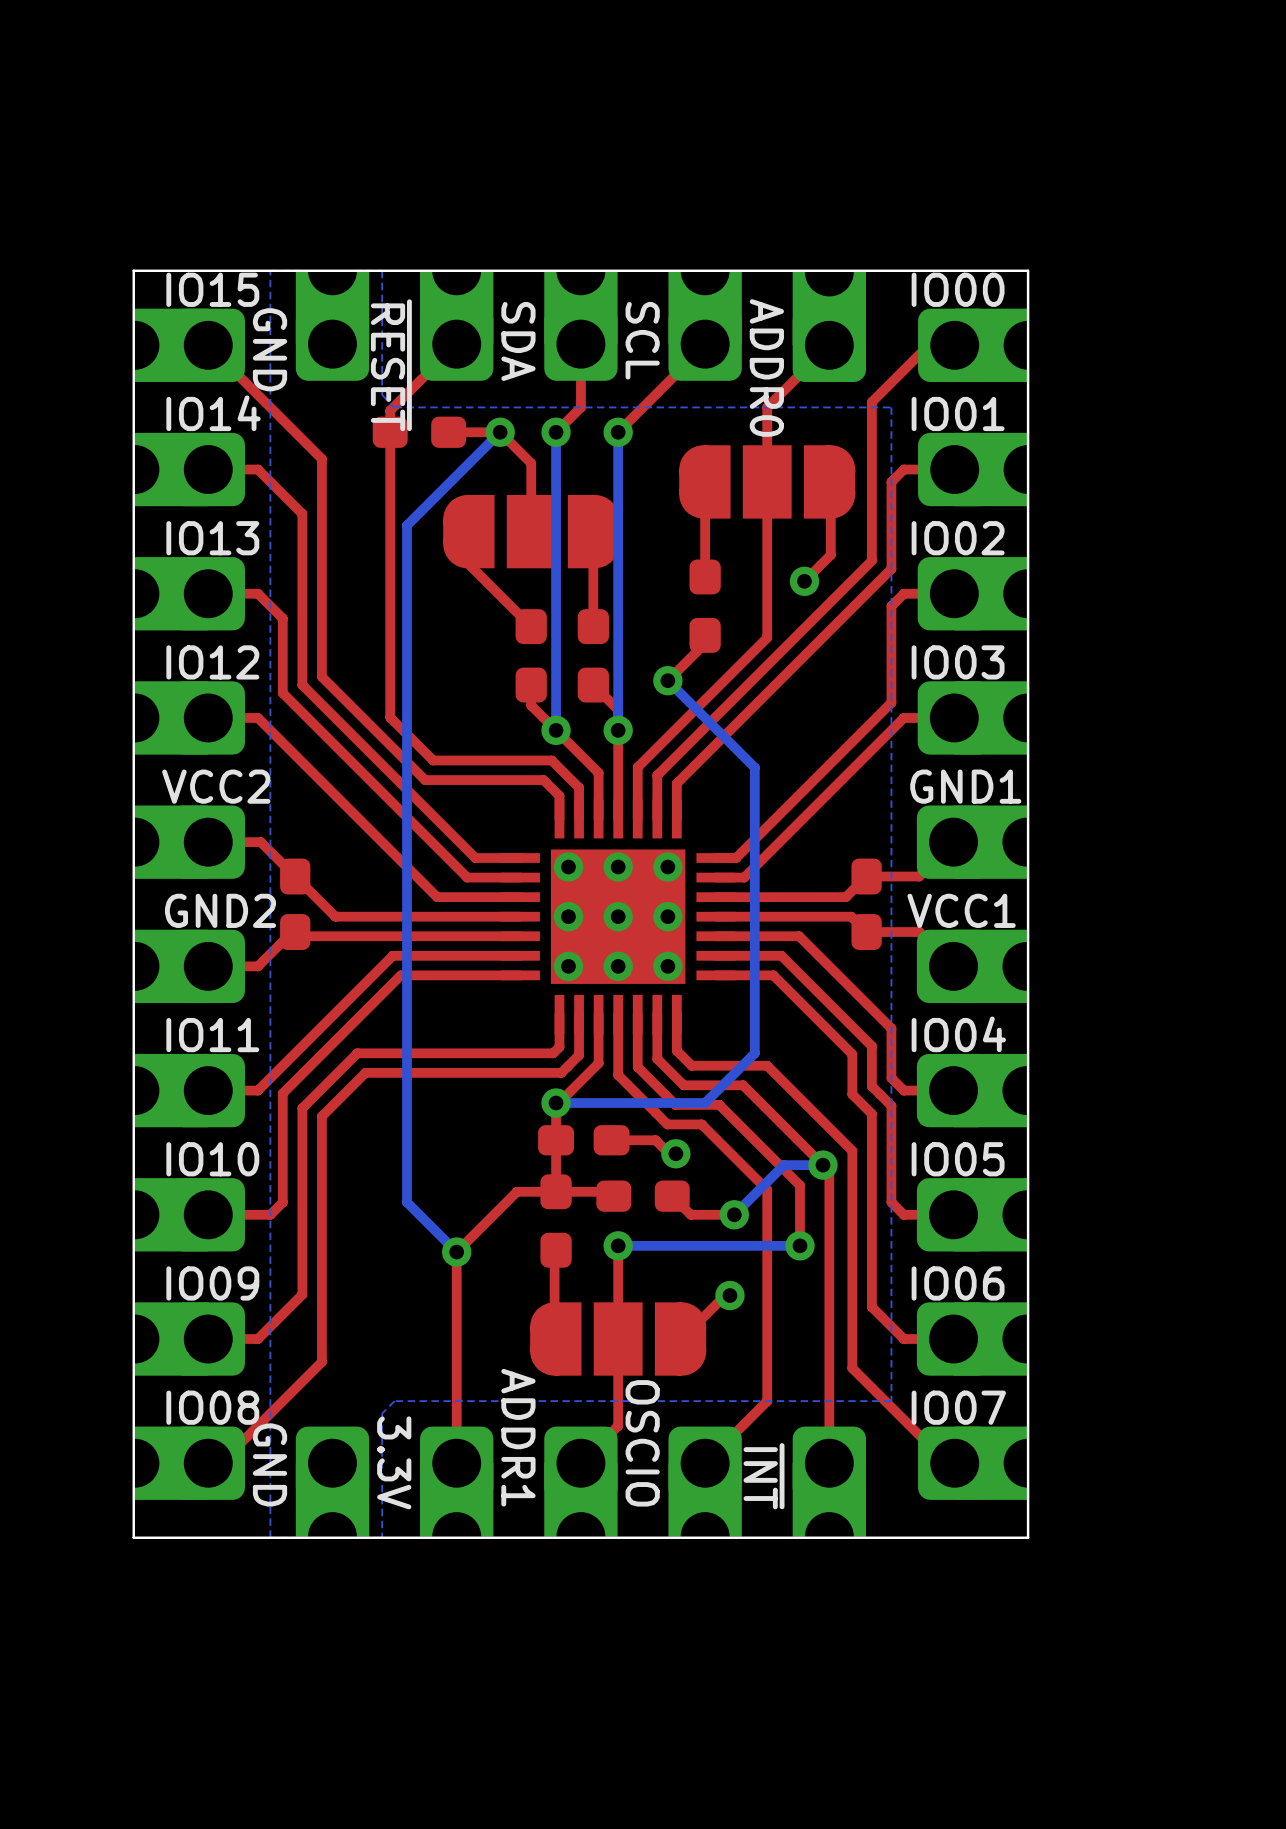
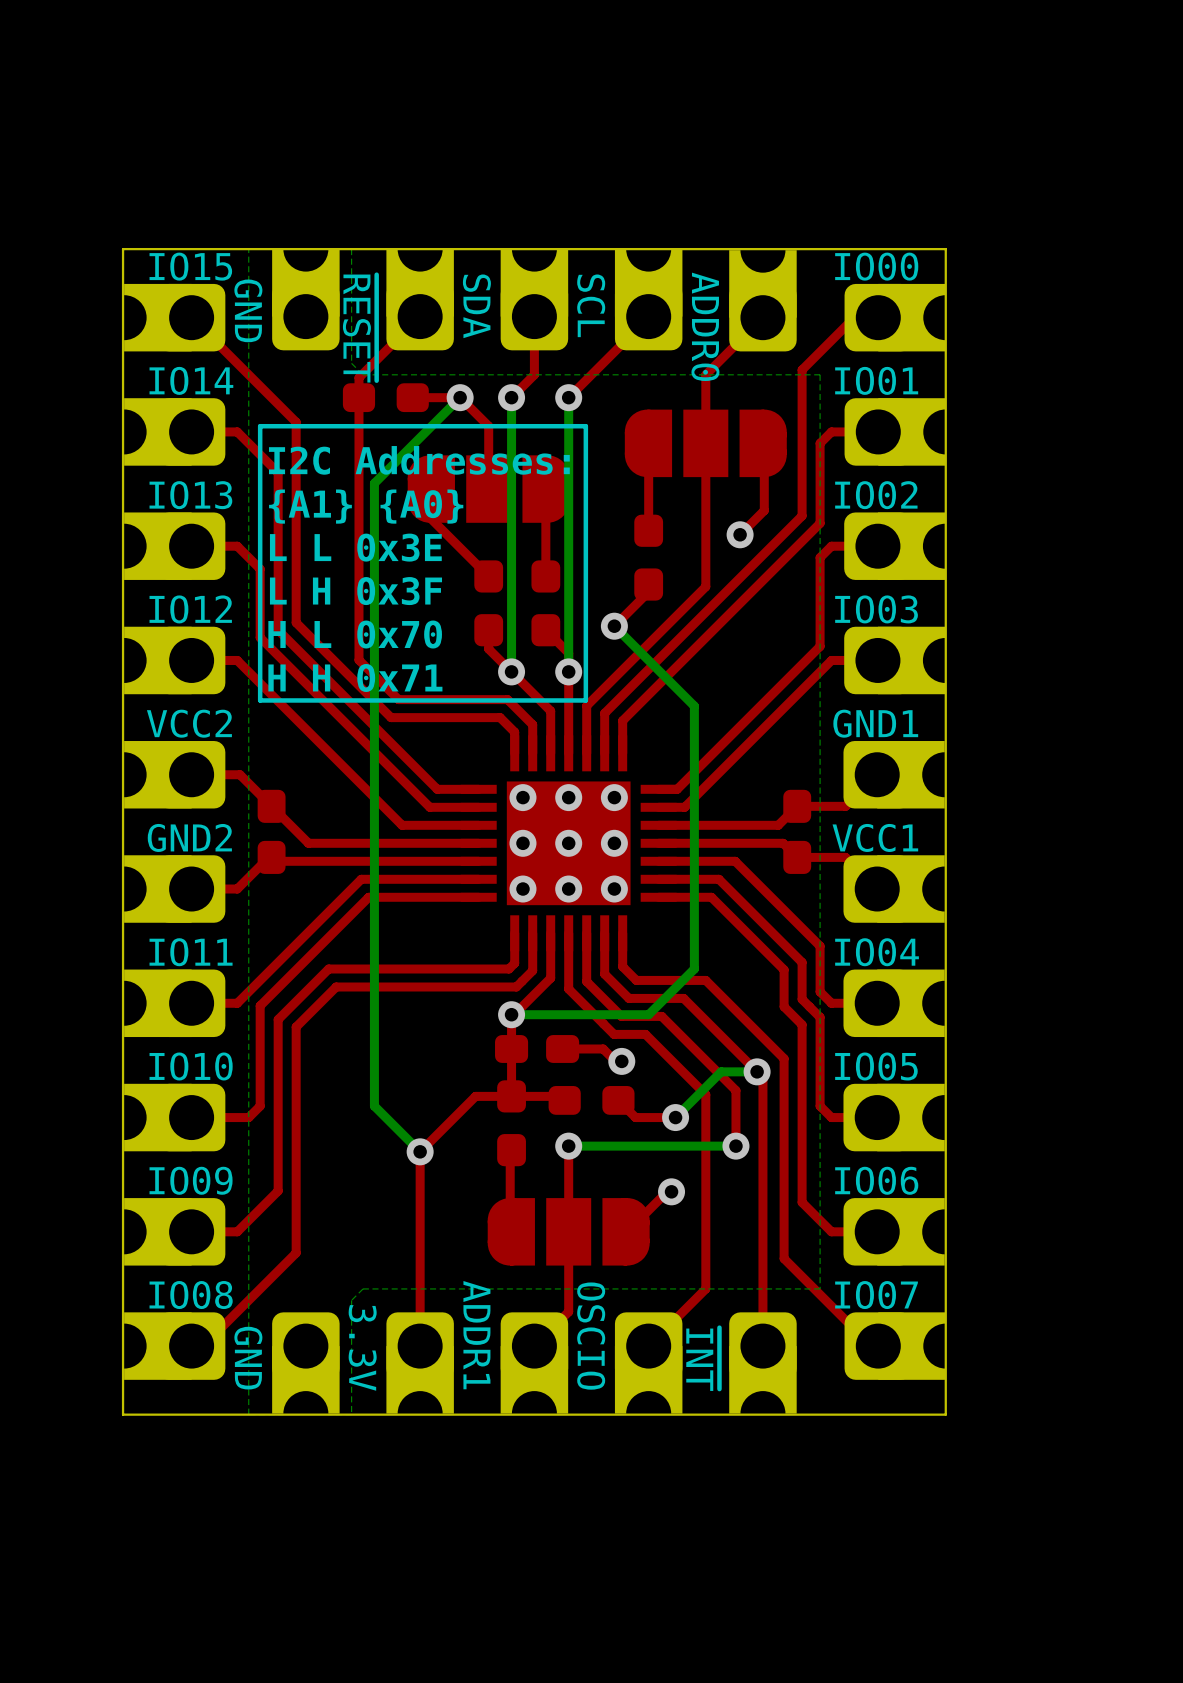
line: none -> (585, 426) (260, 426) (260, 700) (585, 700) (585, 426)
text: none -> I2C Addresses: (419, 460)
text: none -> {A1} {A0} (366, 506)
text: none -> L L 0x3E (355, 547)
text: none -> L H 0x3F (355, 591)
text: none -> H L 0x70 (355, 634)
text: none -> H H 0x71 (355, 677)

